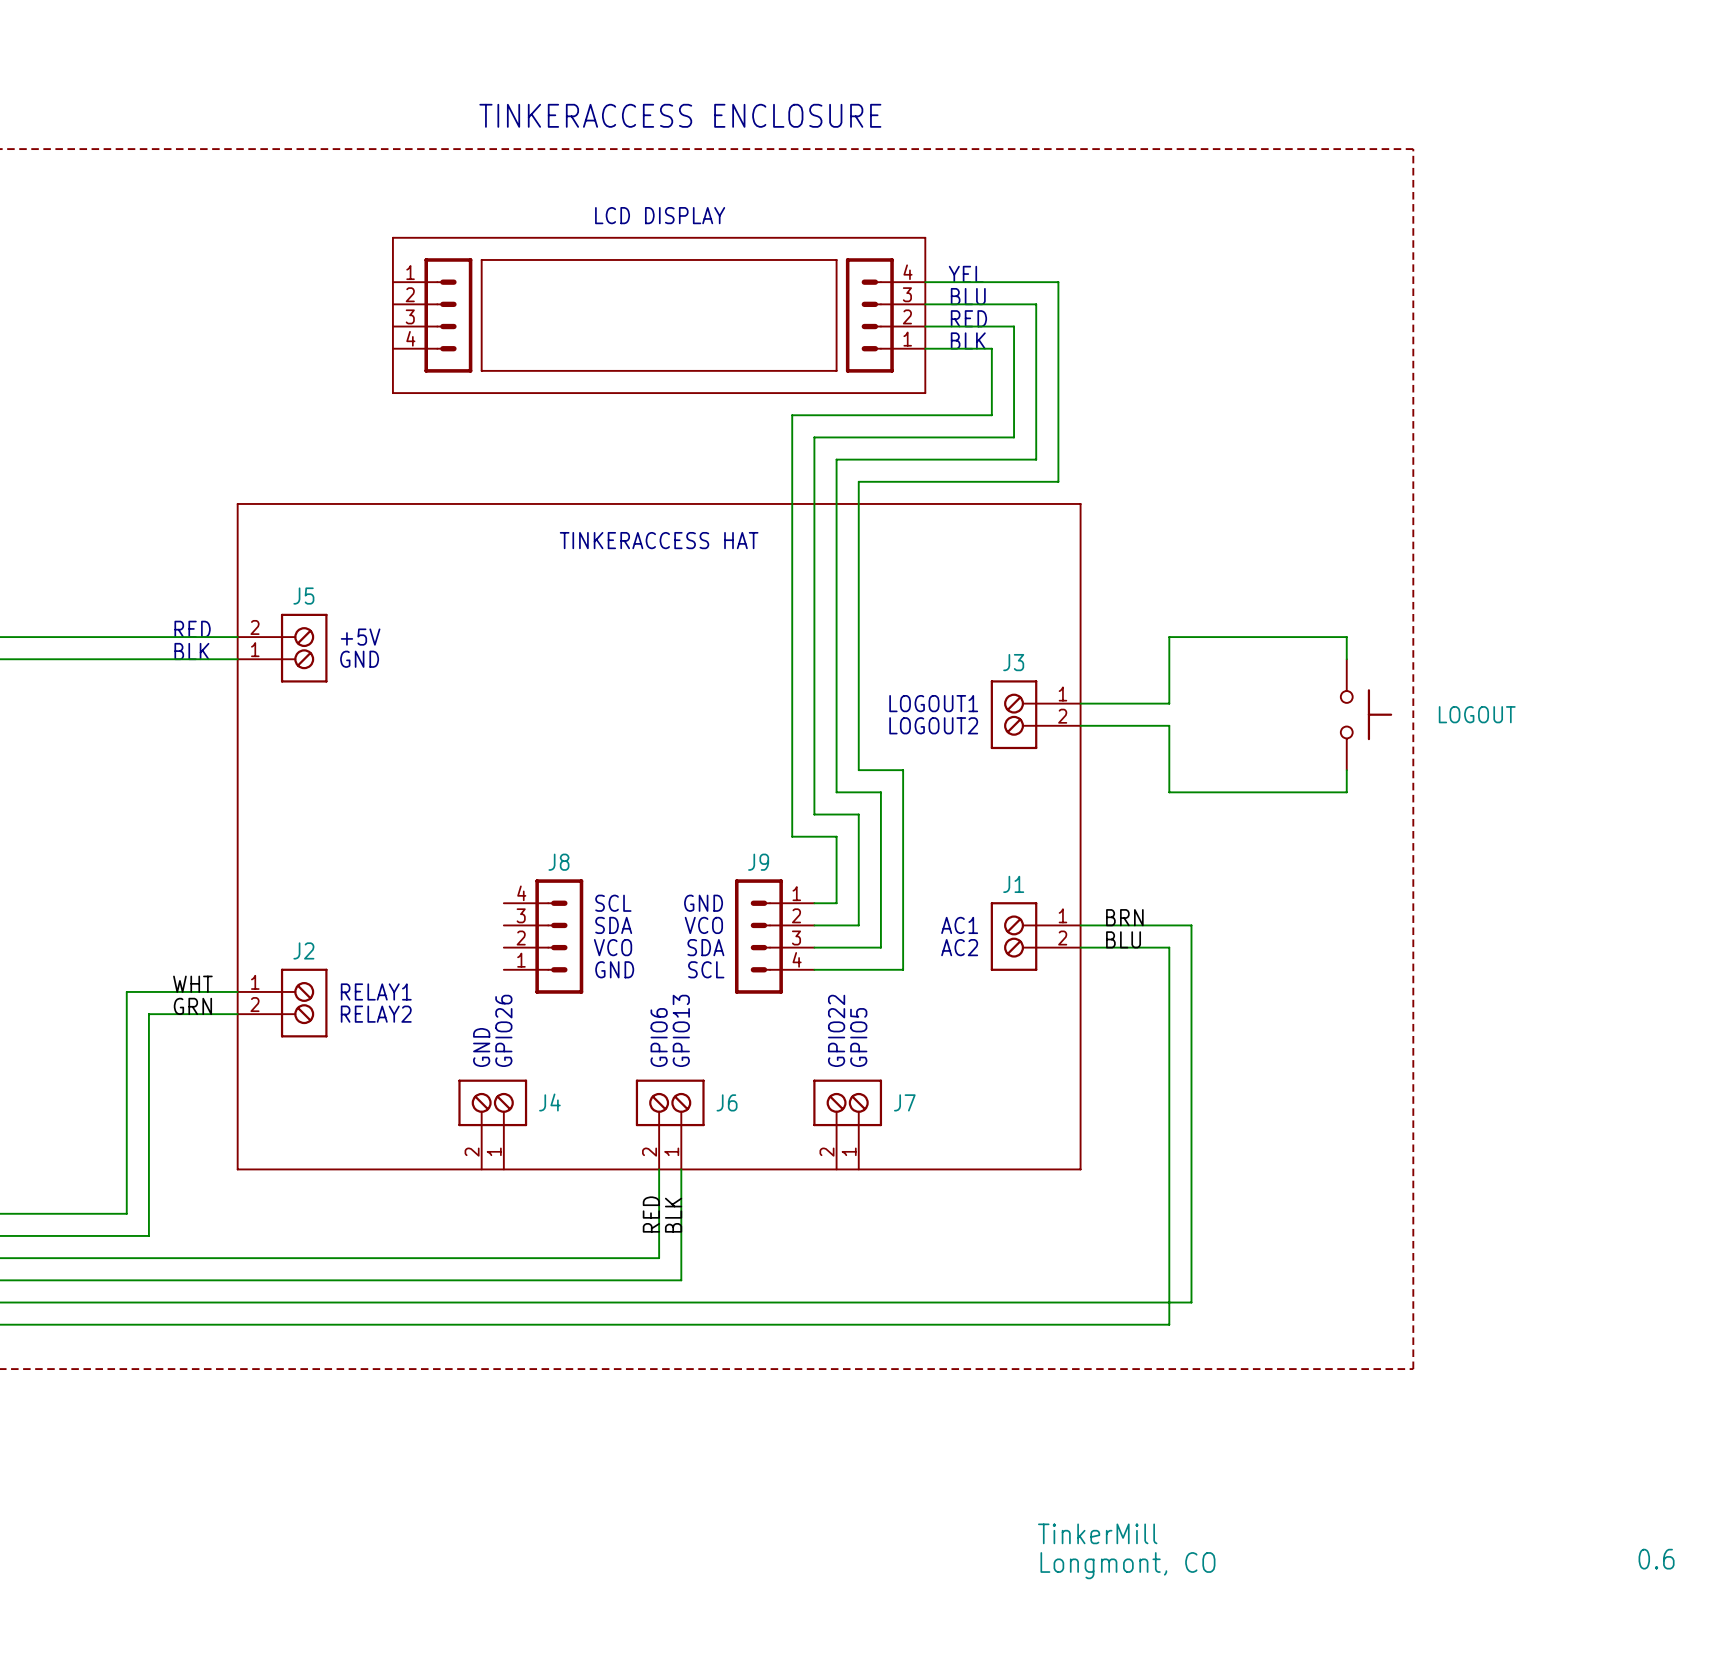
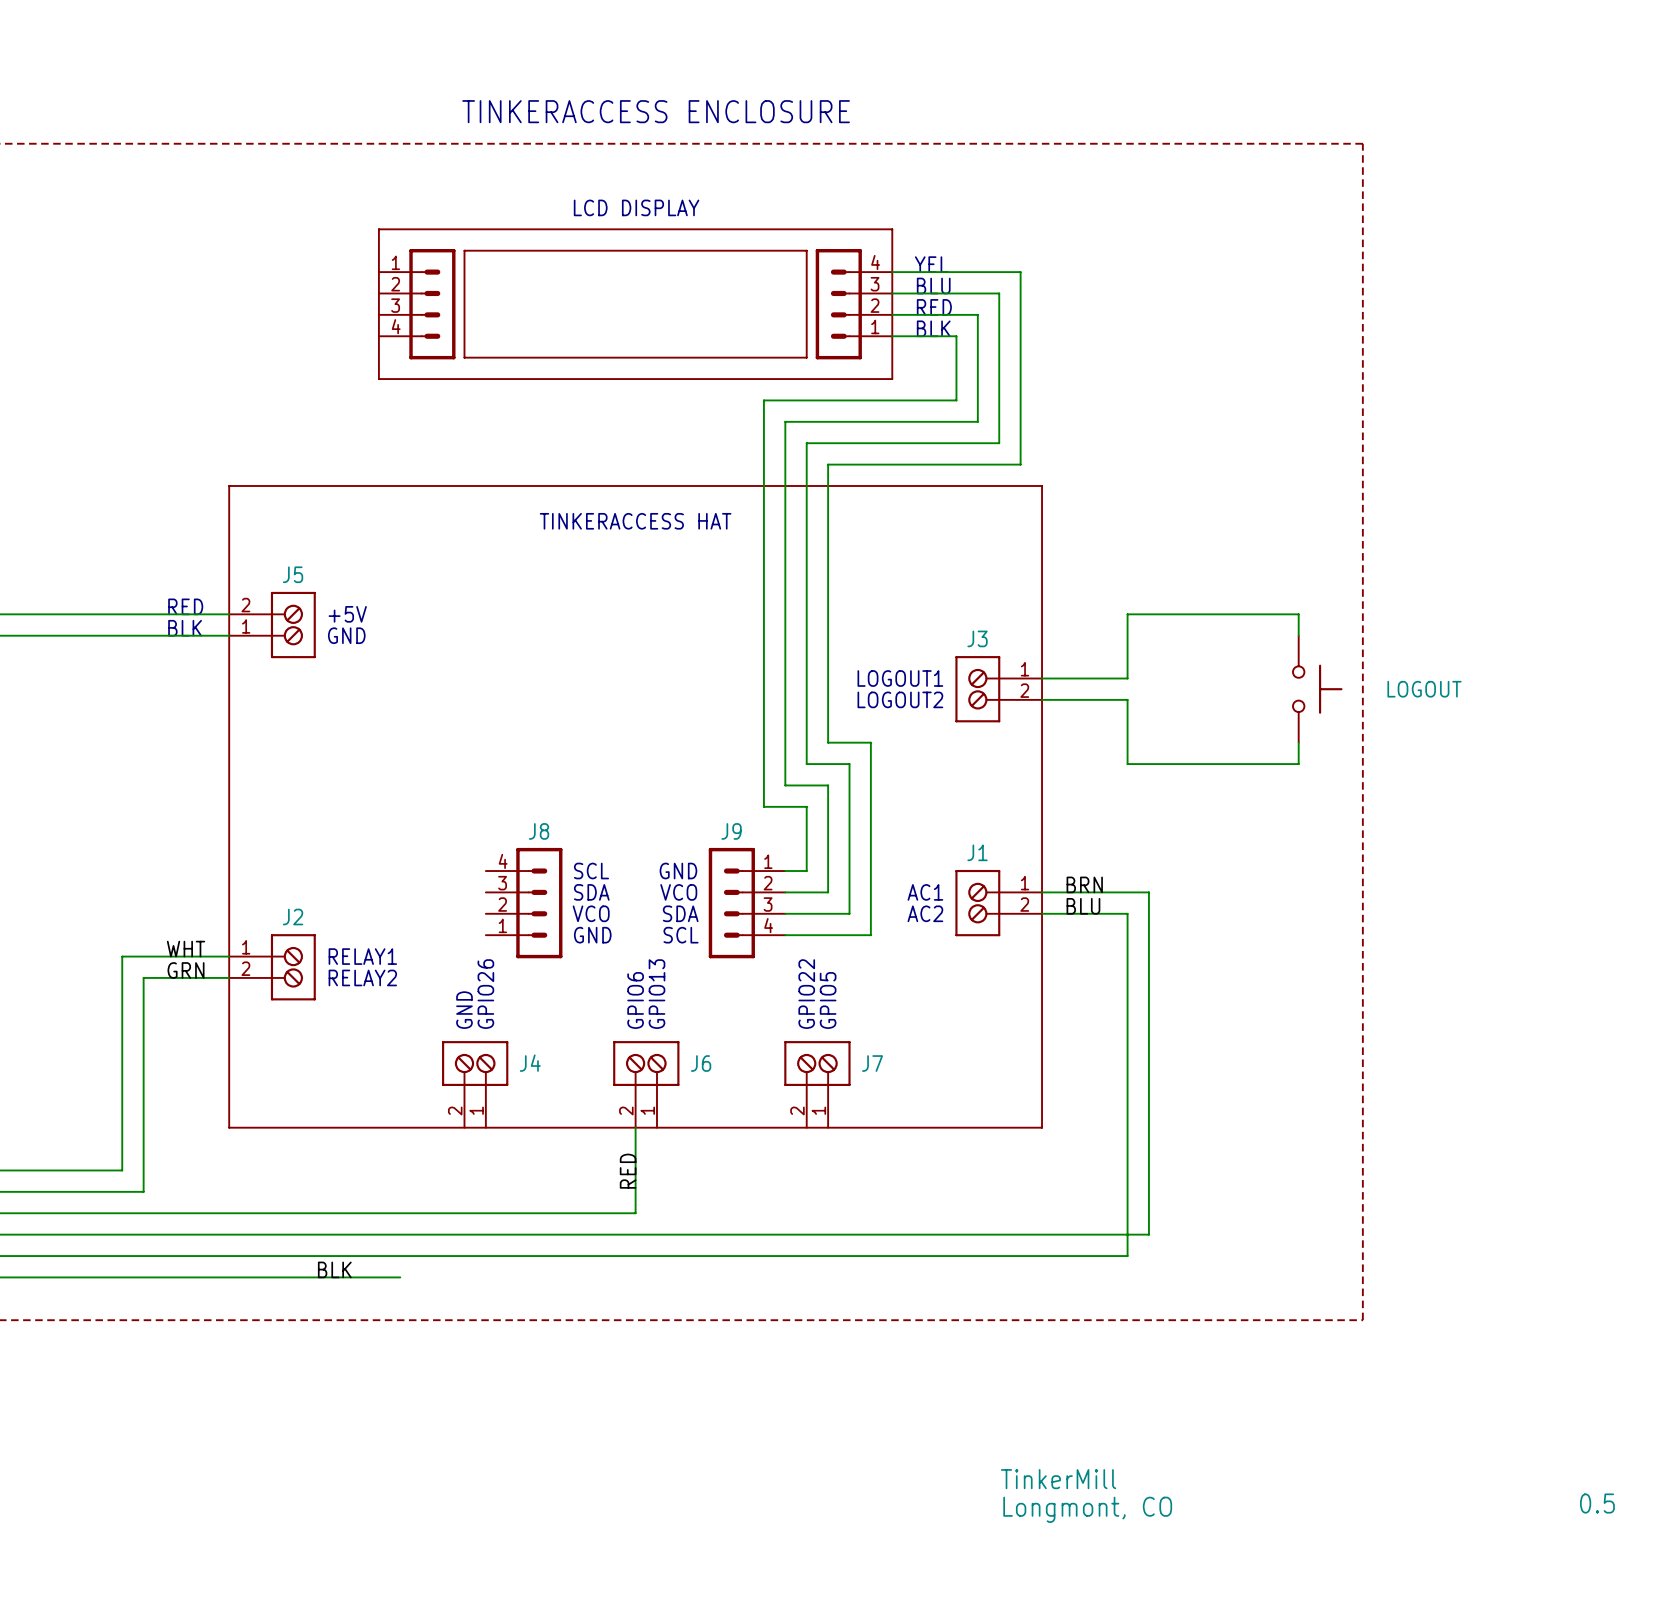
wire: (681, 1169) (681, 1280) -> none
label: BLK (673, 1215) -> none
wire: (1191, 1280) (1191, 1302) (1169, 1302) (1169, 1324) (415, 1324) -> (1148, 1234) (656, 1234)
label: none -> BLK (334, 1269)
text: 0.6 (1656, 1559) -> 0.5 (1597, 1503)

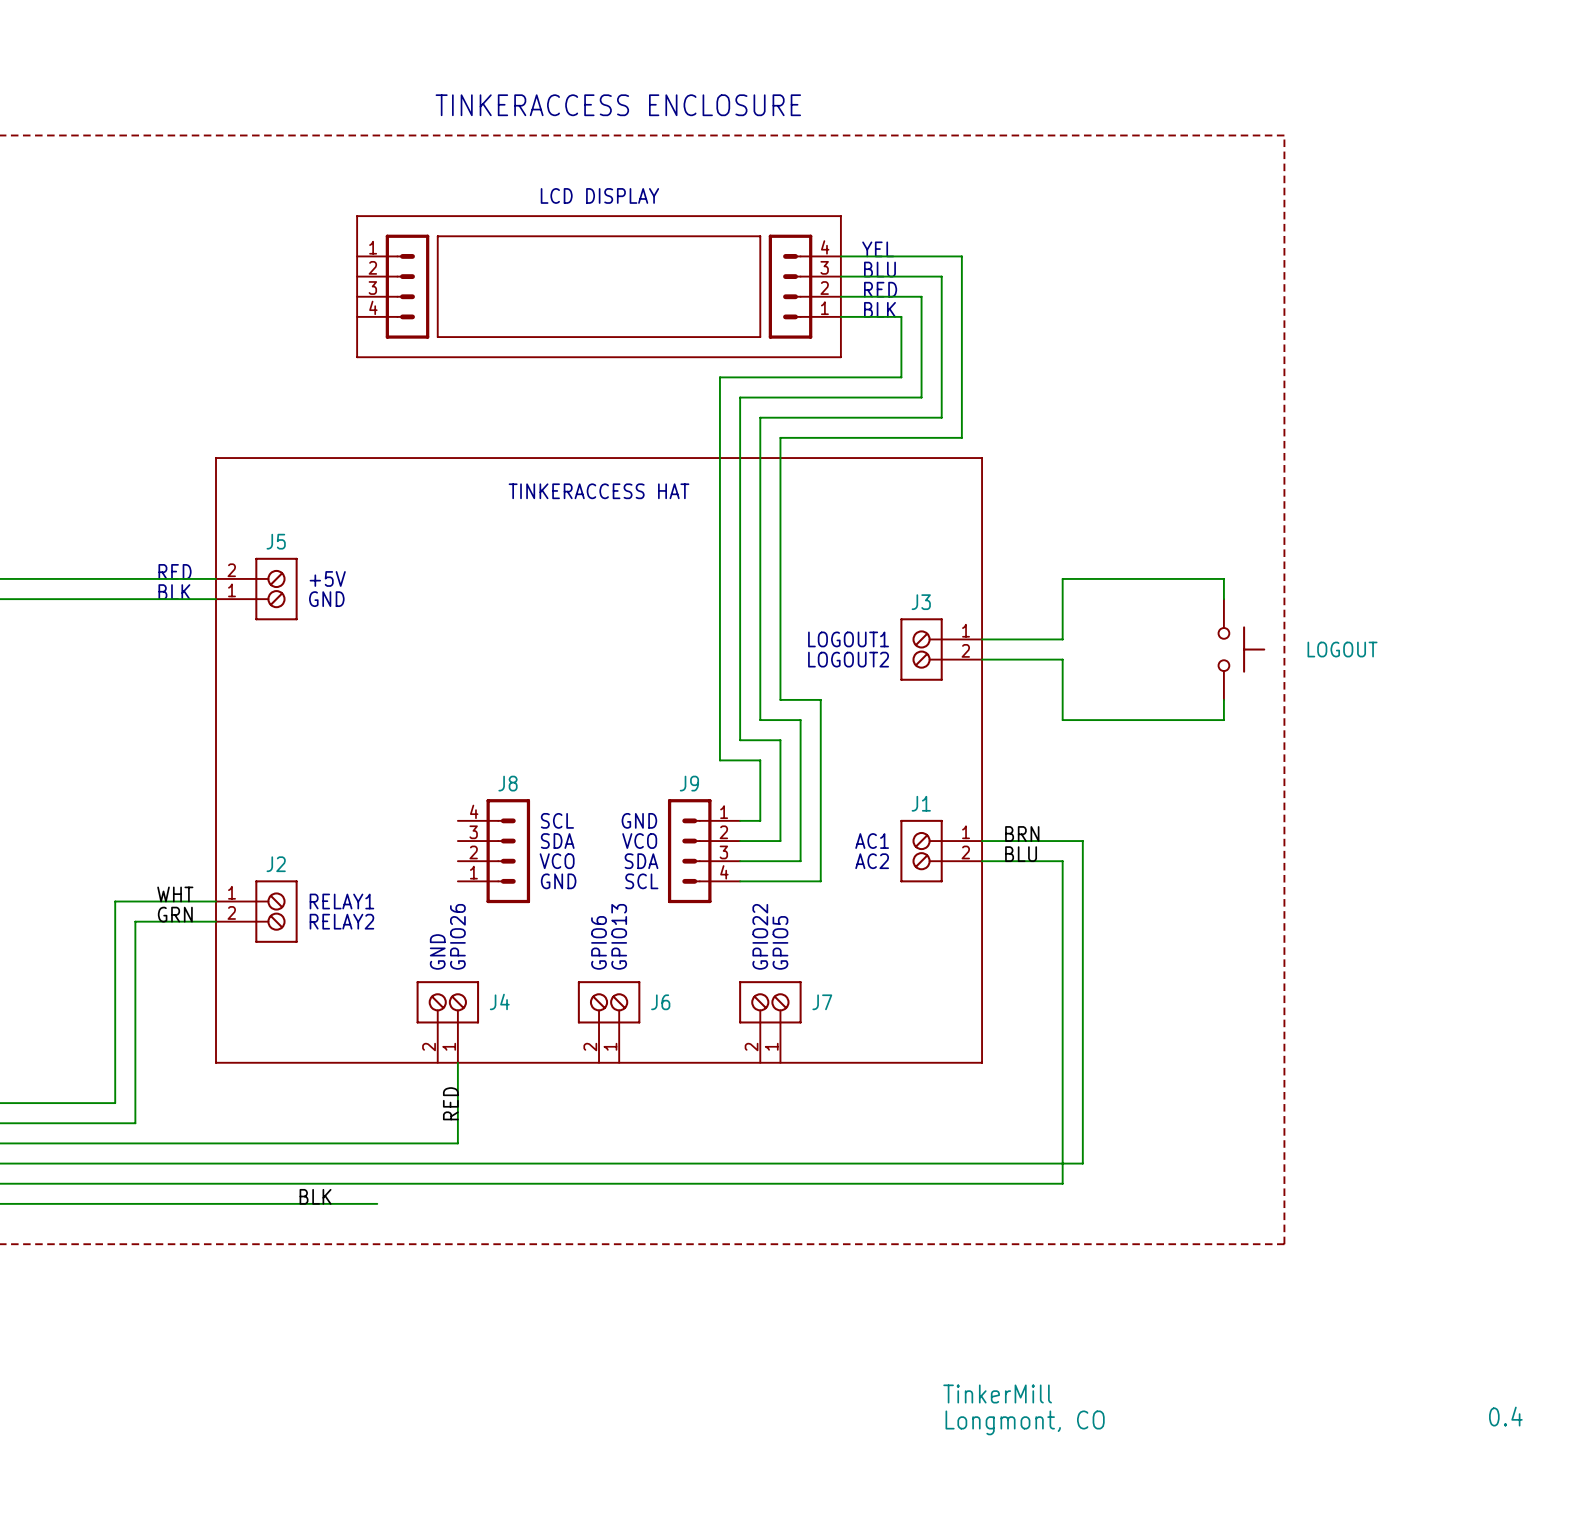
wire: (635, 1127) (635, 1213) (485, 1213) -> (457, 1062) (457, 1143)
label position: RED (628, 1171) -> RED (450, 1103)
text: 0.5 (1597, 1503) -> 0.4 (1505, 1416)

